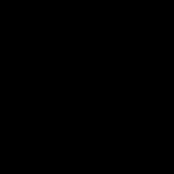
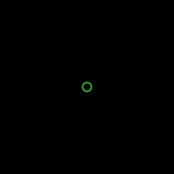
via: none -> (86, 86)

